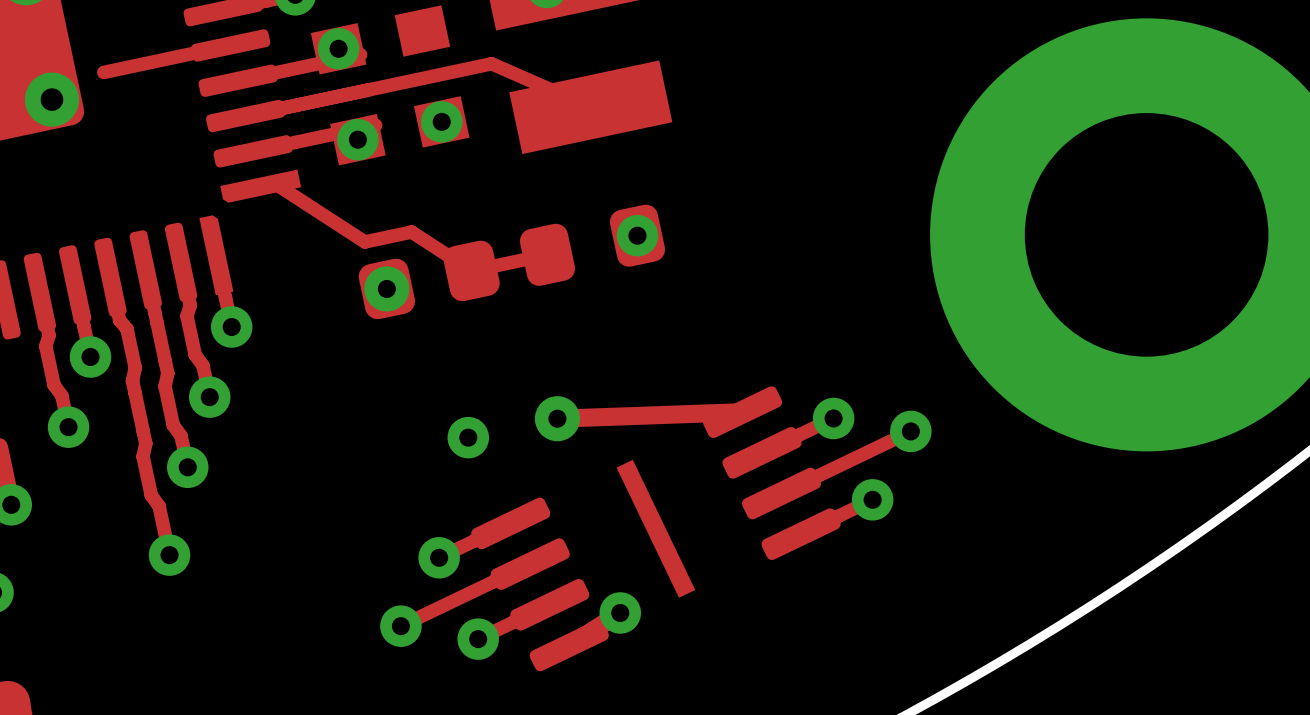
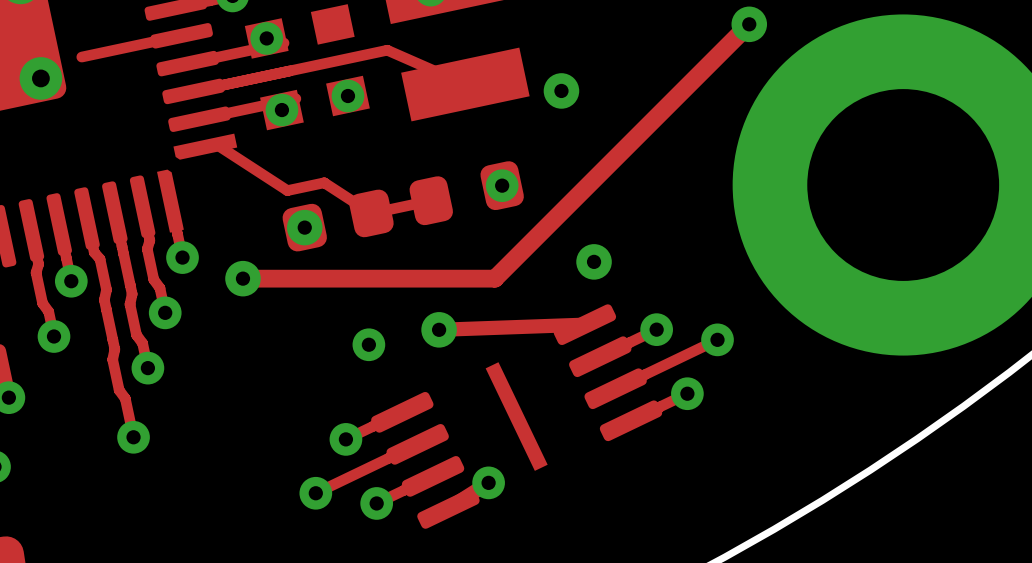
track: none -> (749, 24) (494, 278) (242, 278)
via: none -> (749, 24)
via: none -> (561, 90)
via: none -> (594, 261)
via: none -> (242, 278)

